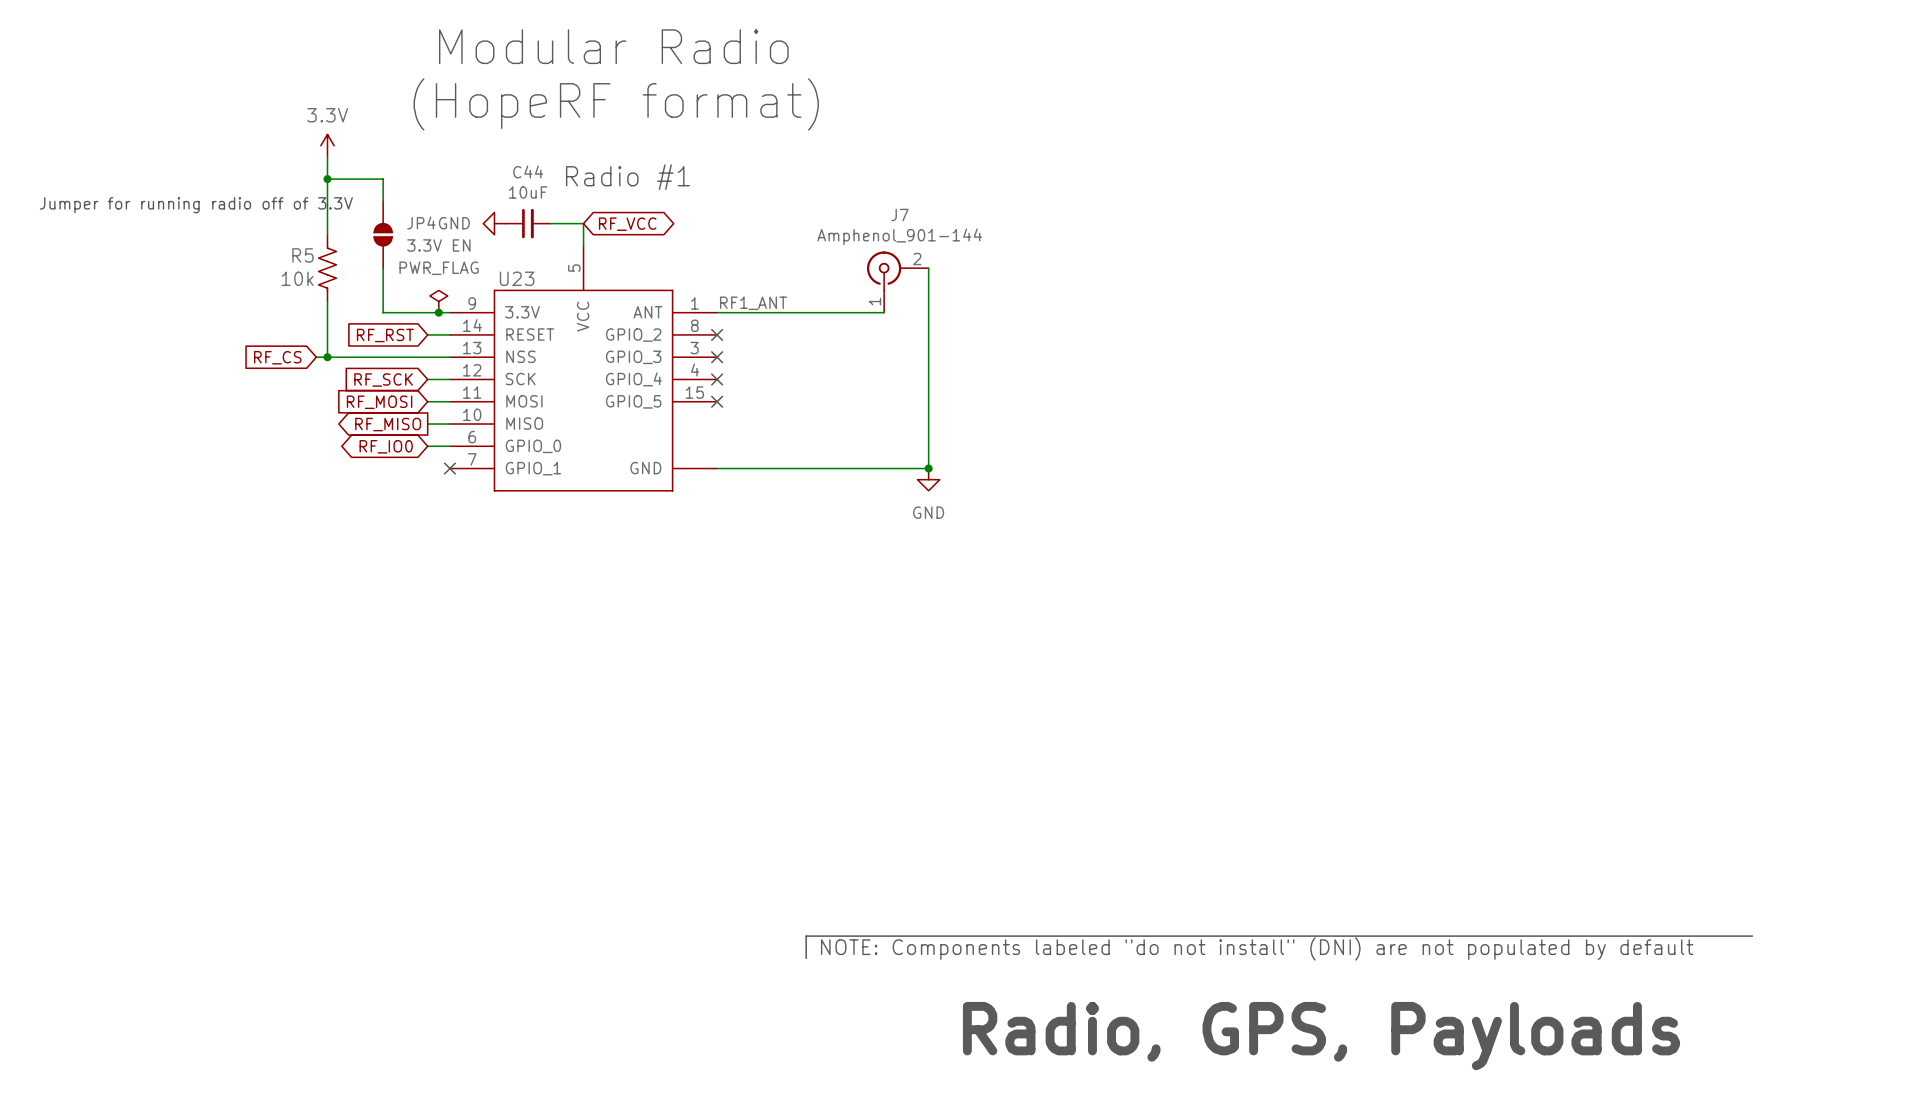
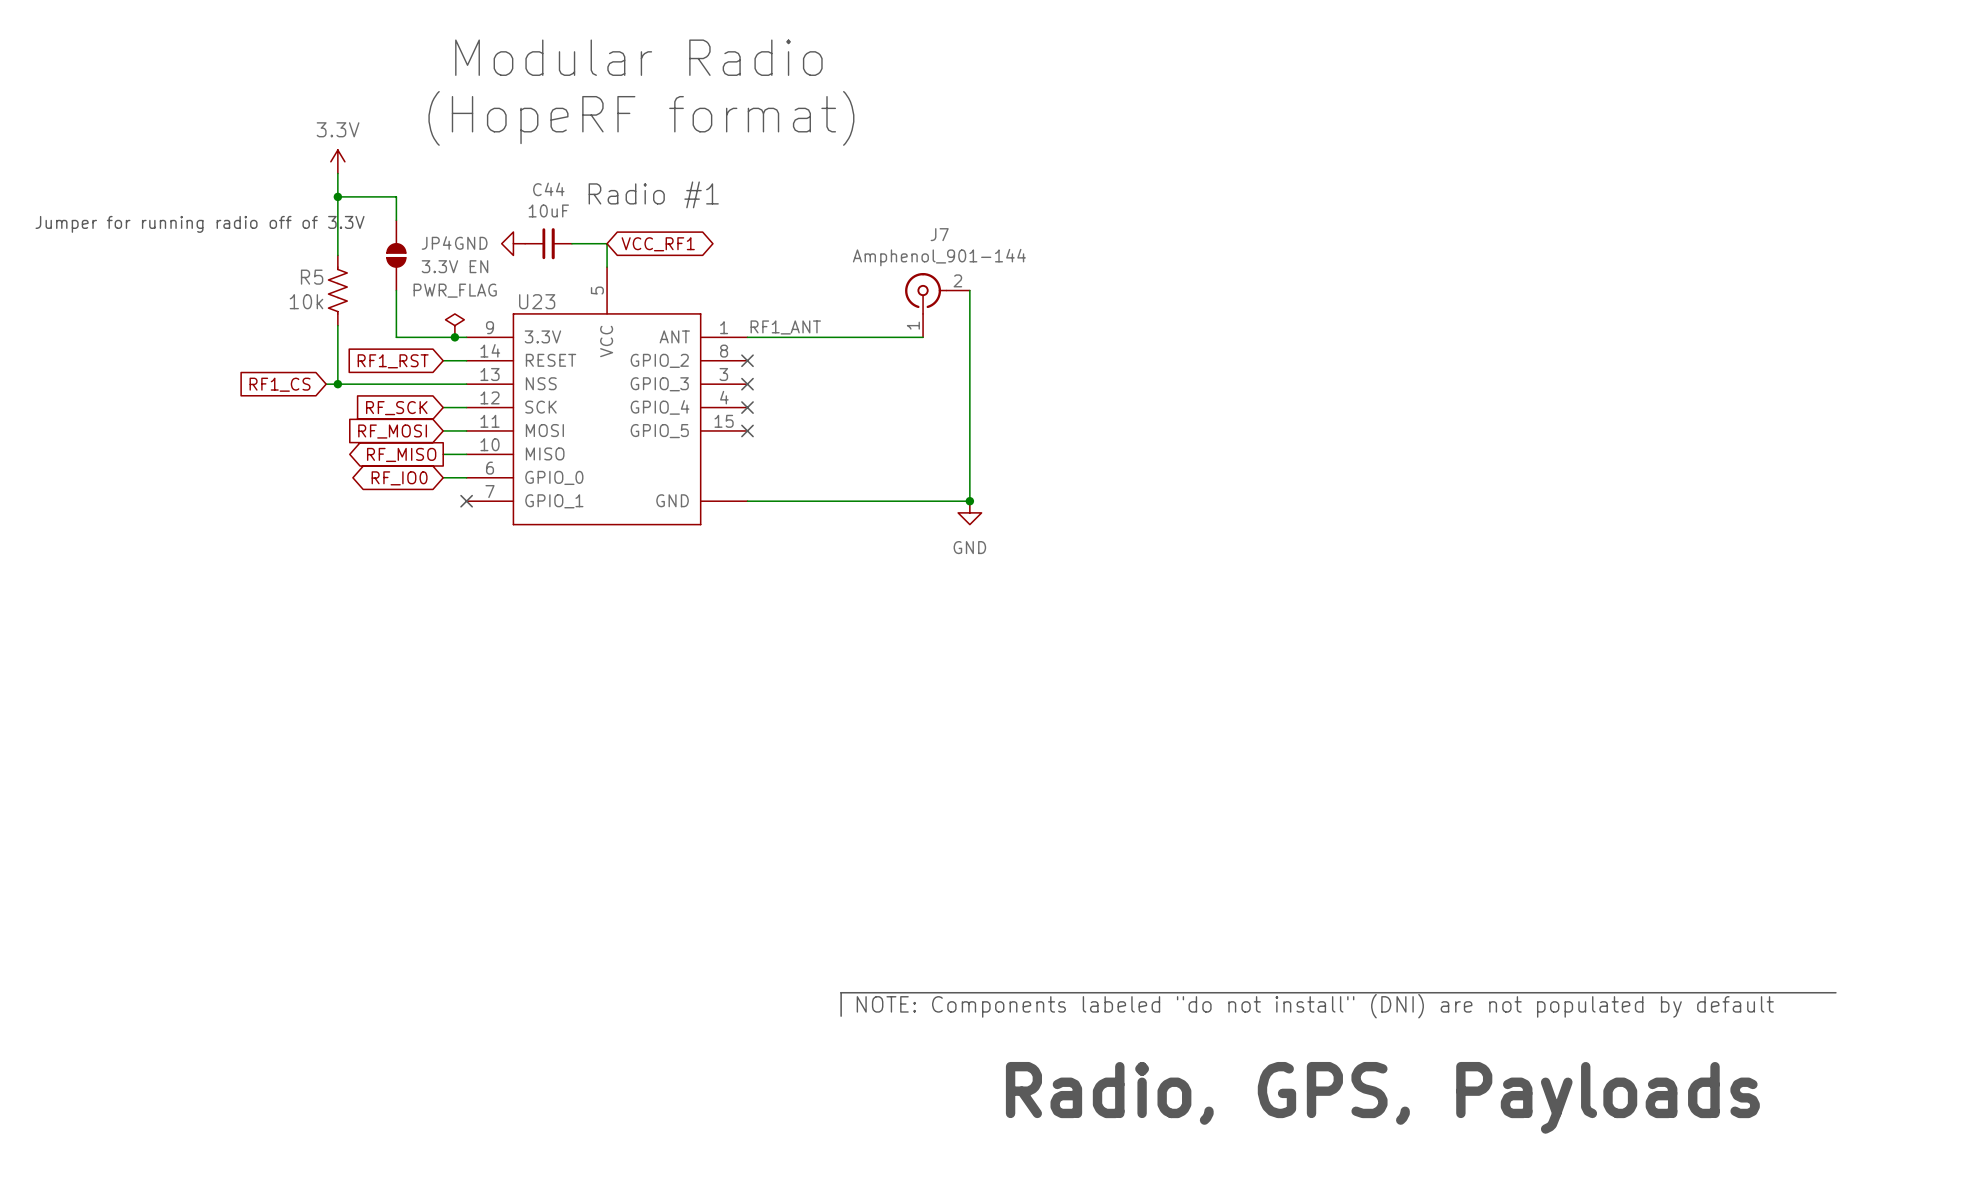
global label: RF_VCC (627, 224) -> VCC_RF1 (658, 244)
global label: RF_RST (385, 335) -> RF1_RST (393, 361)
global label: RF_CS (277, 357) -> RF1_CS (280, 384)

